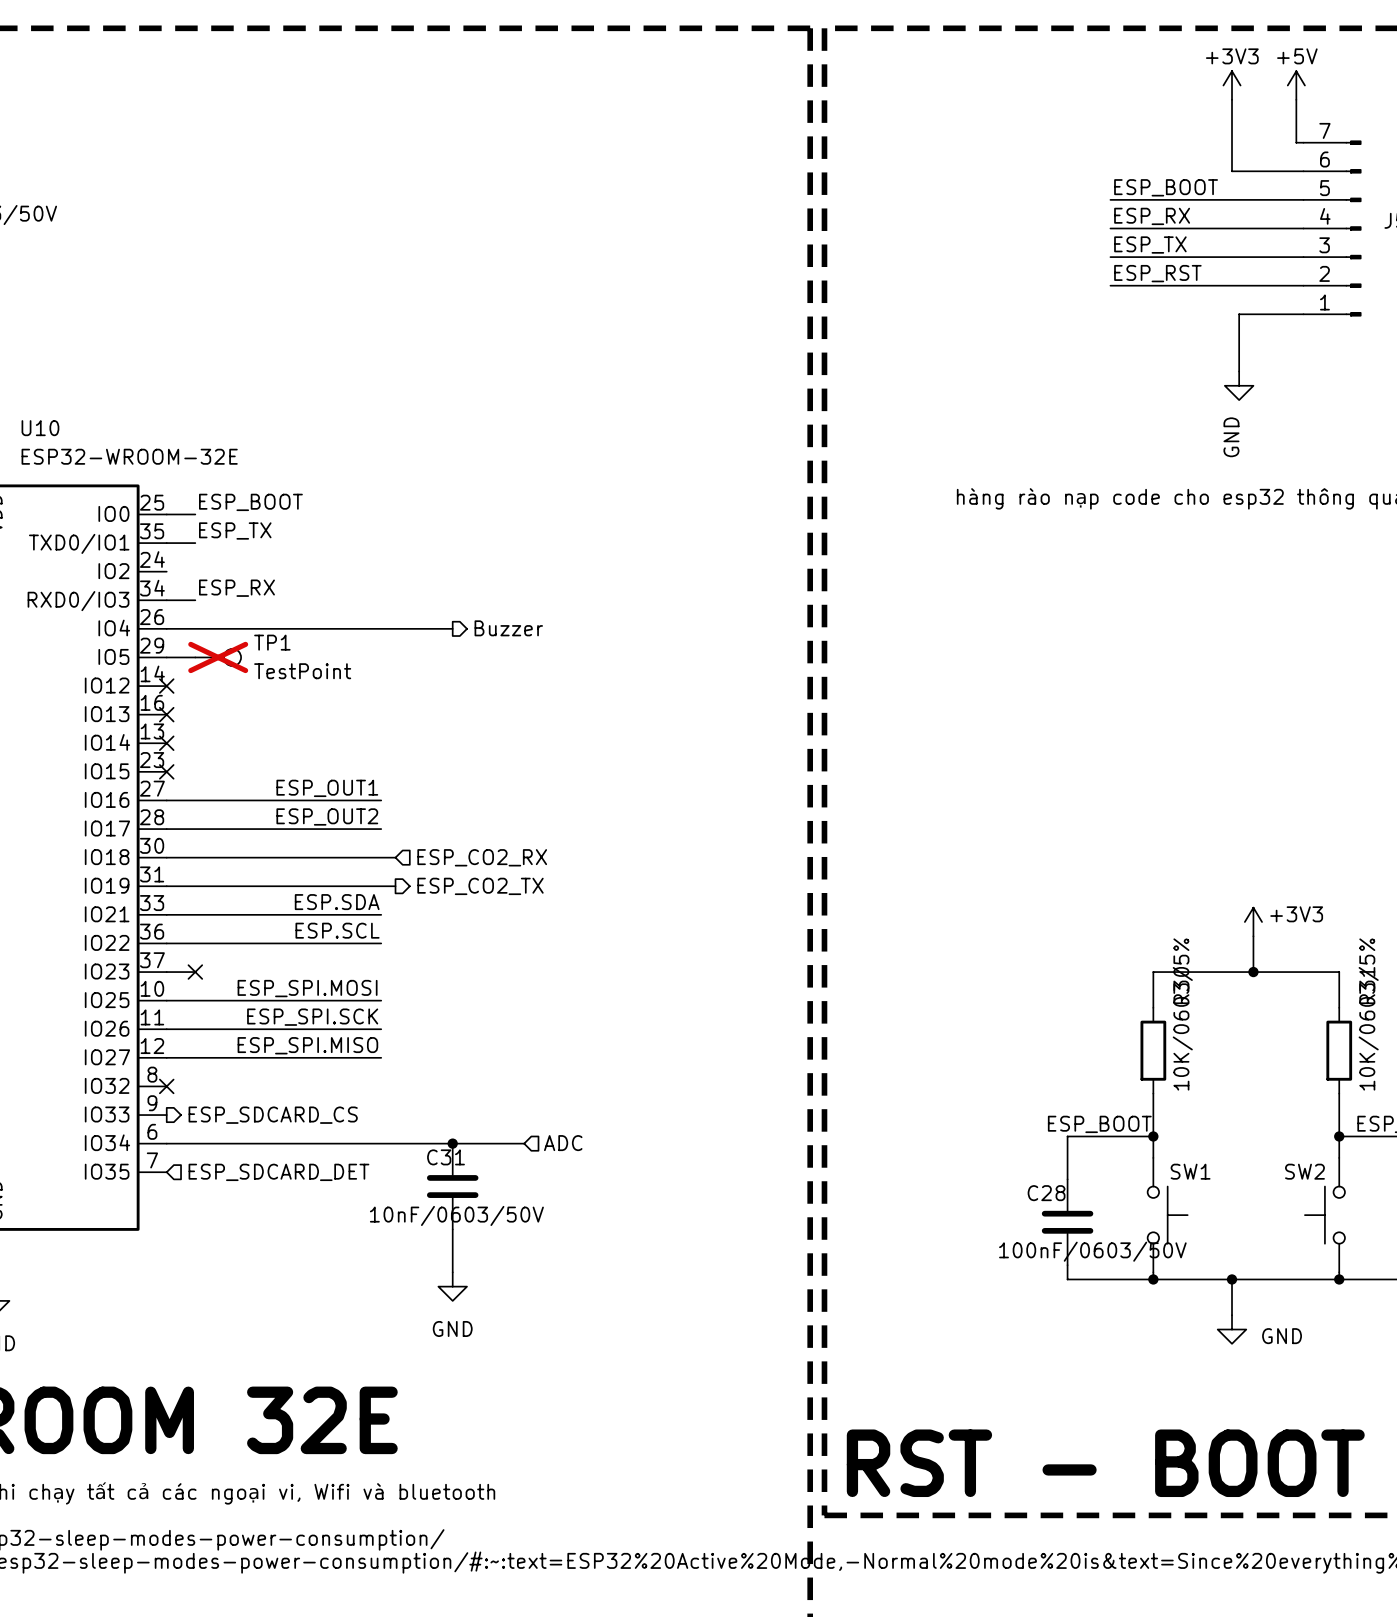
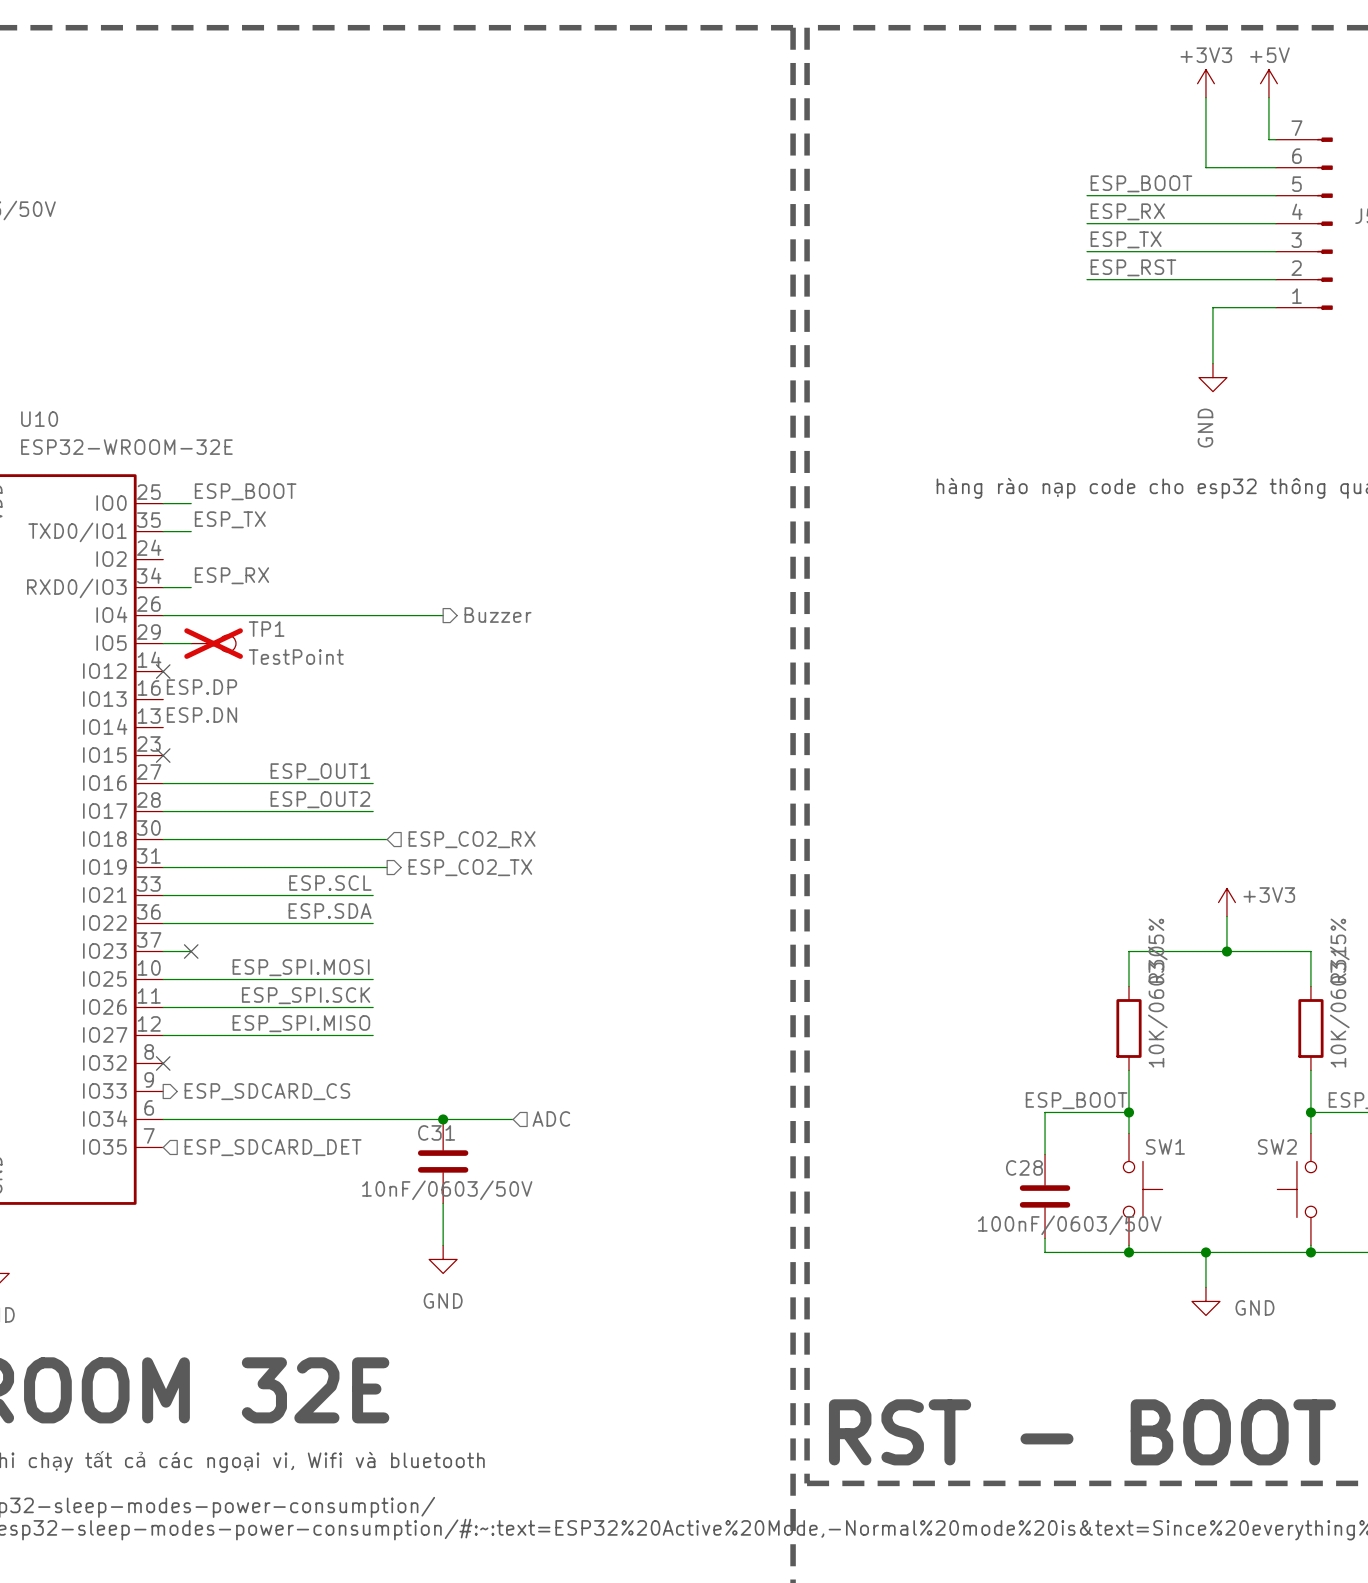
label: none -> ESP.DP (201, 687)
no-connect mark: (166, 714) -> none
label: none -> ESP.DN (201, 715)
no-connect mark: (166, 743) -> none
label: ESP.SDA (337, 902) -> ESP.SCL (330, 883)
label: ESP.SCL (337, 930) -> ESP.SDA (330, 911)

